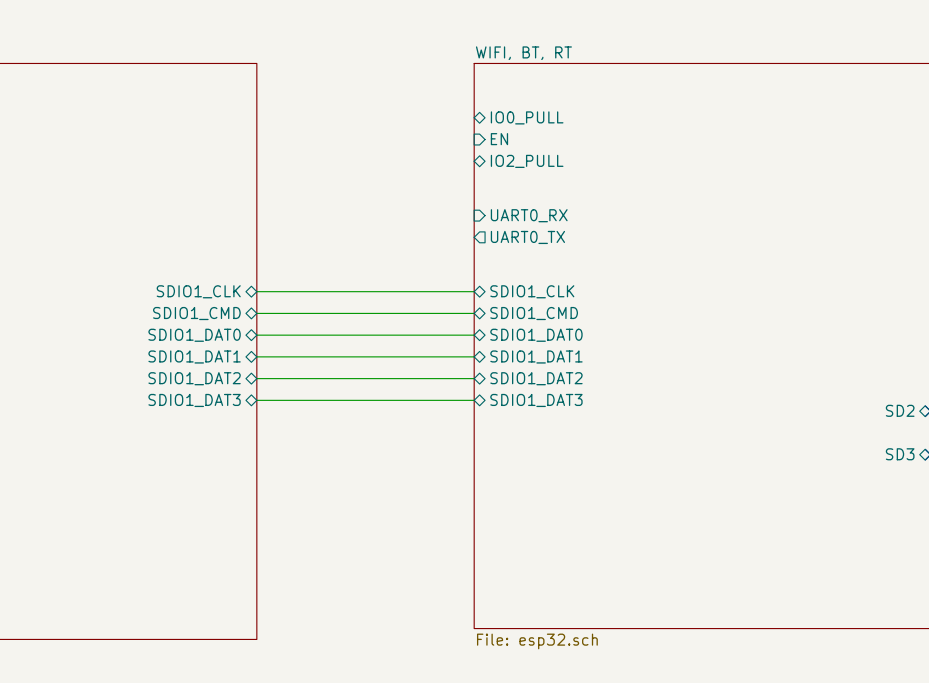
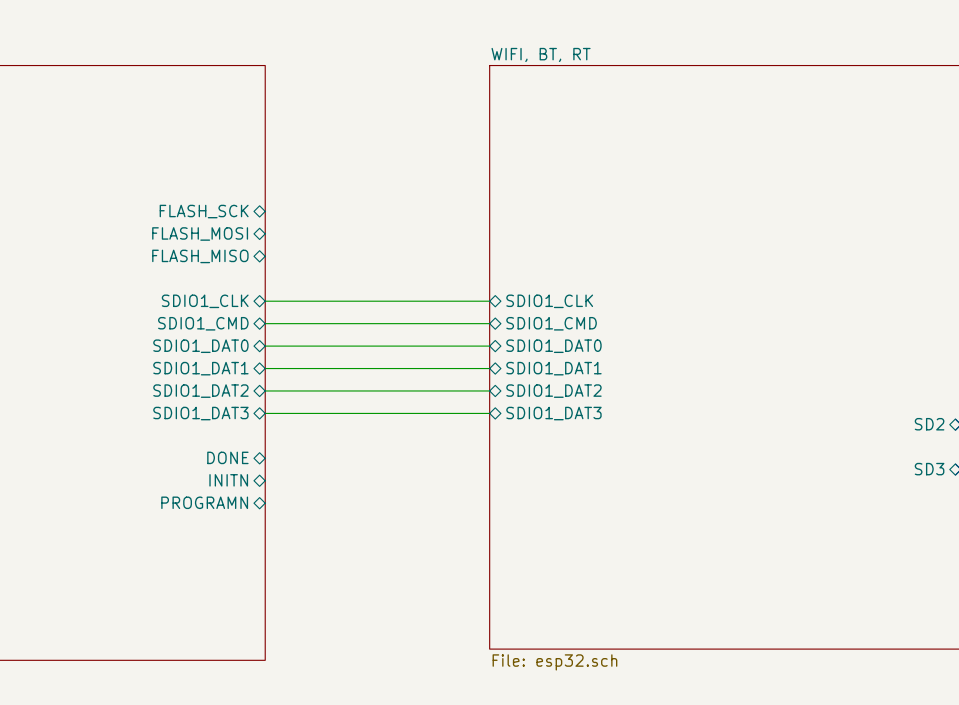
sheet pin: IO0_PULL (527, 117) -> none
sheet pin: EN (499, 139) -> none
sheet pin: IO2_PULL (527, 161) -> none
sheet pin: none -> FLASH_SCK (204, 211)
sheet pin: UART0_RX (529, 215) -> none
sheet pin: none -> FLASH_MOSI (200, 233)
sheet pin: UART0_TX (527, 237) -> none
sheet pin: none -> FLASH_MISO (200, 256)
sheet pin: none -> DONE (227, 457)
sheet pin: none -> INITN (228, 480)
sheet pin: none -> PROGRAMN (204, 502)

